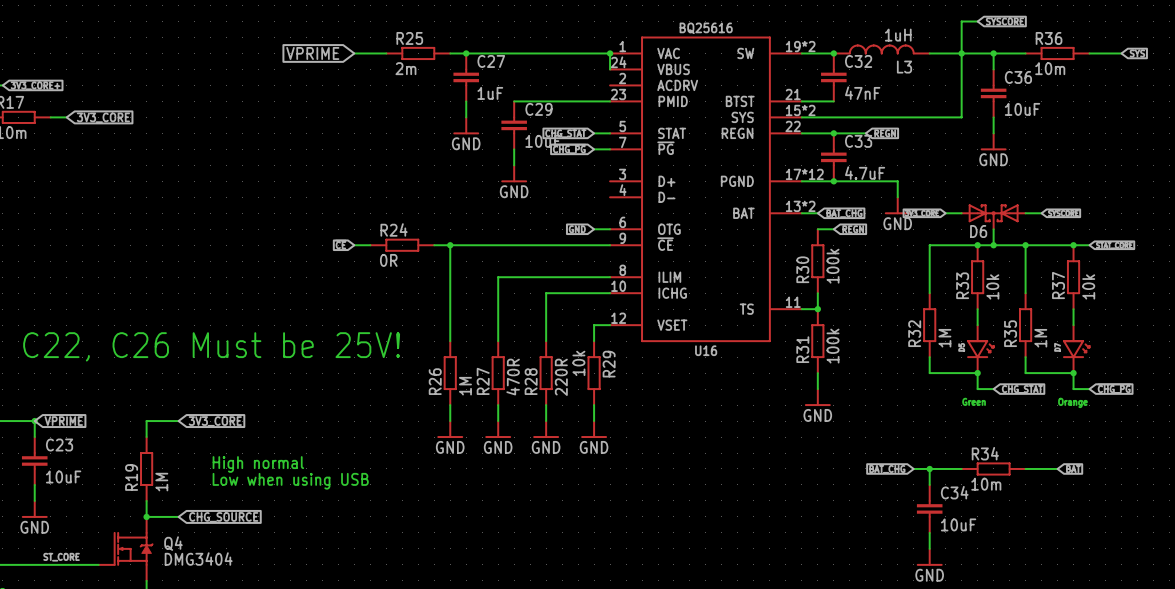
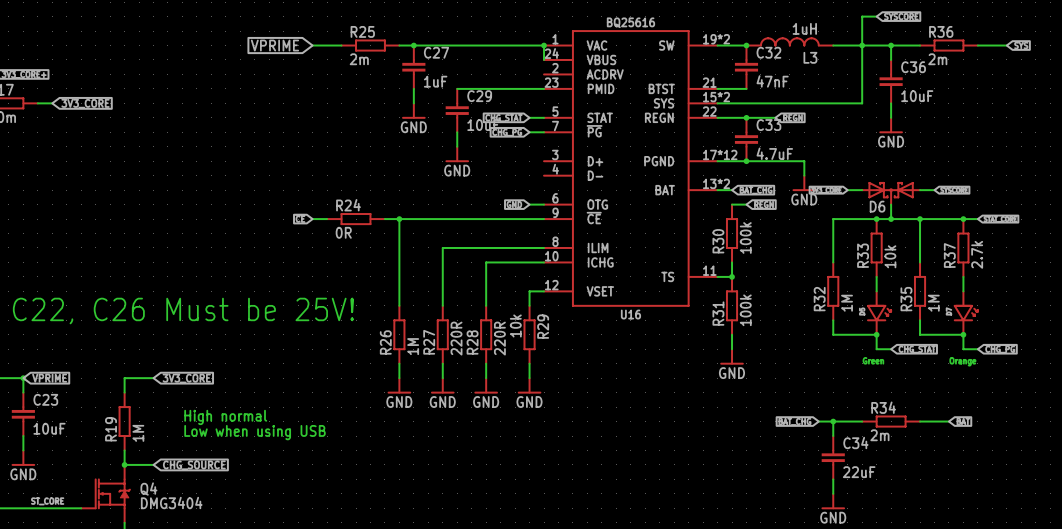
R36 value: 10m (1050, 68) -> 2m (937, 59)
R37 value: 10k (1088, 286) -> 2.7k (977, 254)
R27 value: 470R (513, 377) -> 220R (456, 338)
R34 value: 10m (986, 484) -> 2m (879, 435)
C34 value: 10uF (958, 524) -> 22uF (859, 472)

